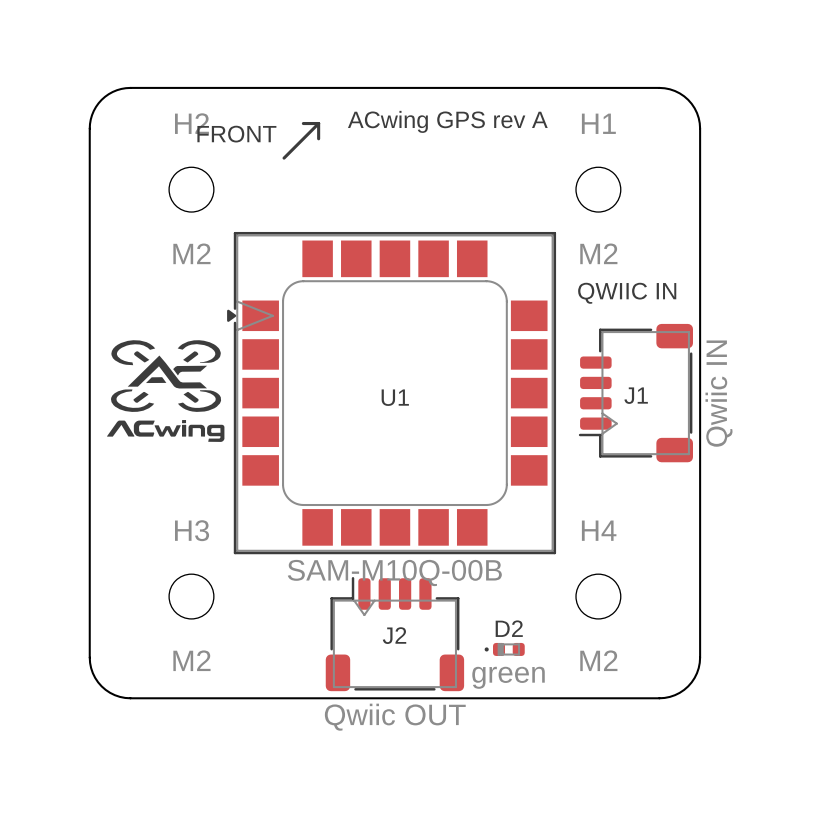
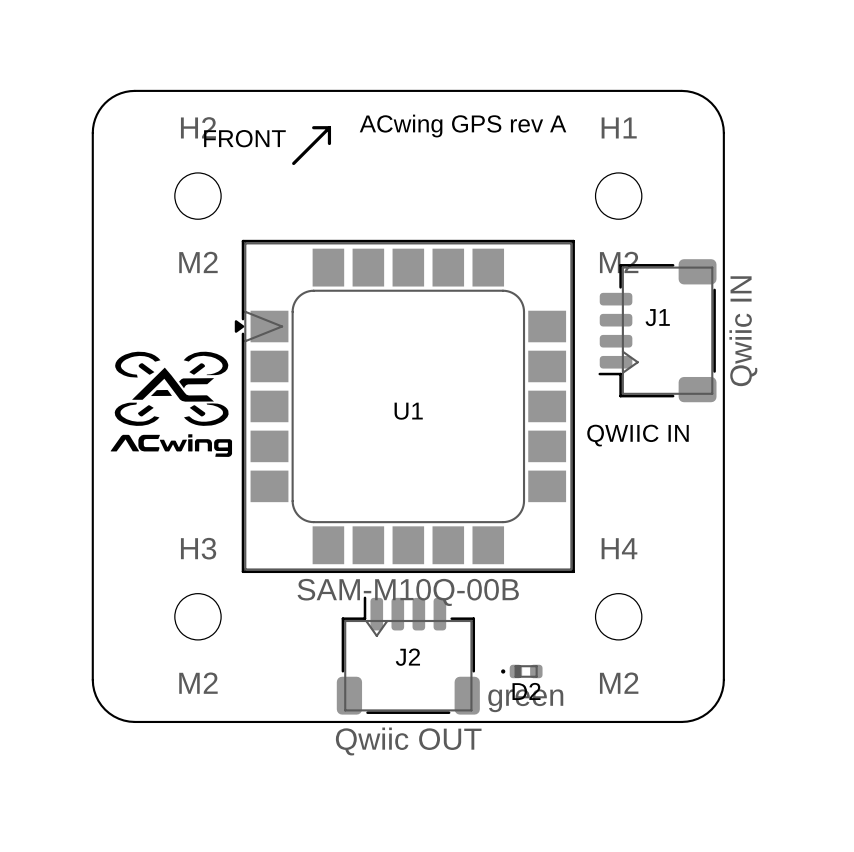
text position: QWIIC IN (627, 293) -> QWIIC IN (637, 435)
J1 position: (635, 393) -> (657, 330)
J1 name position: J1 (636, 395) -> J1 (657, 317)
D2 name position: D2 (509, 628) -> D2 (526, 691)

